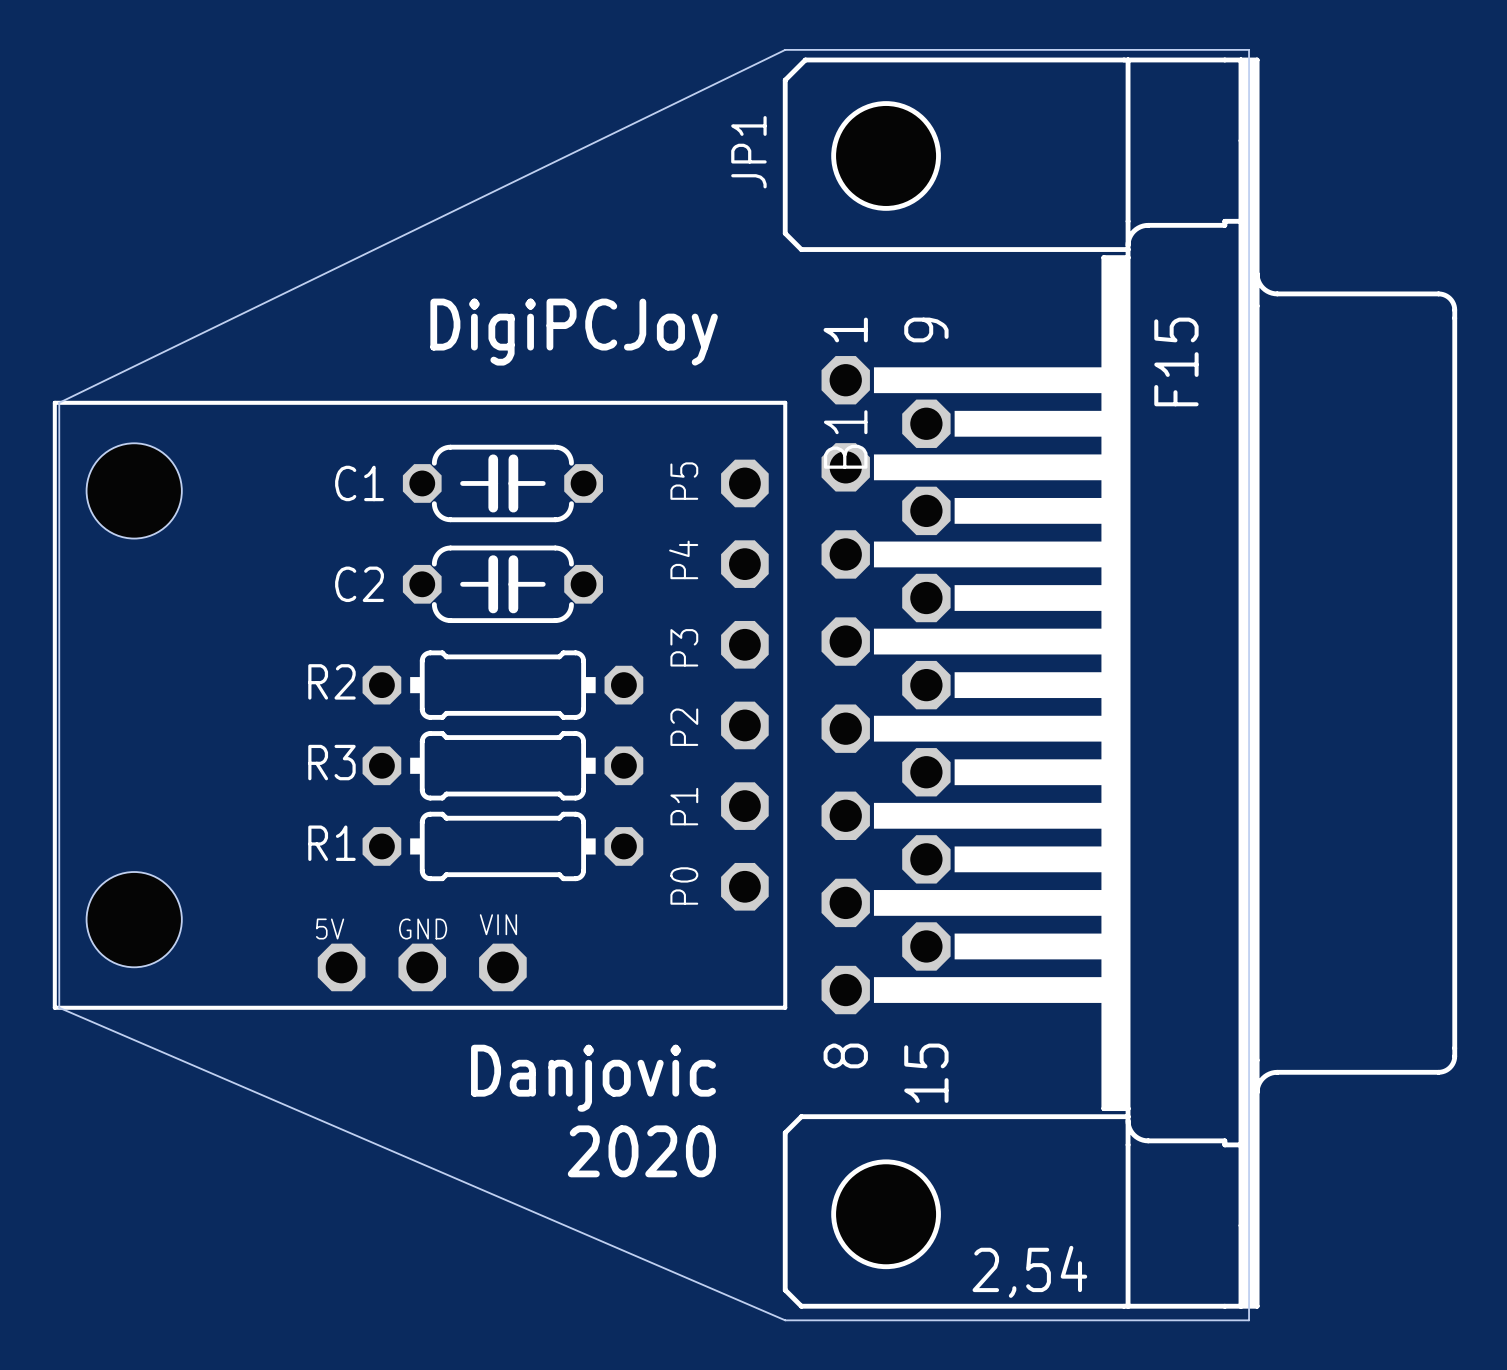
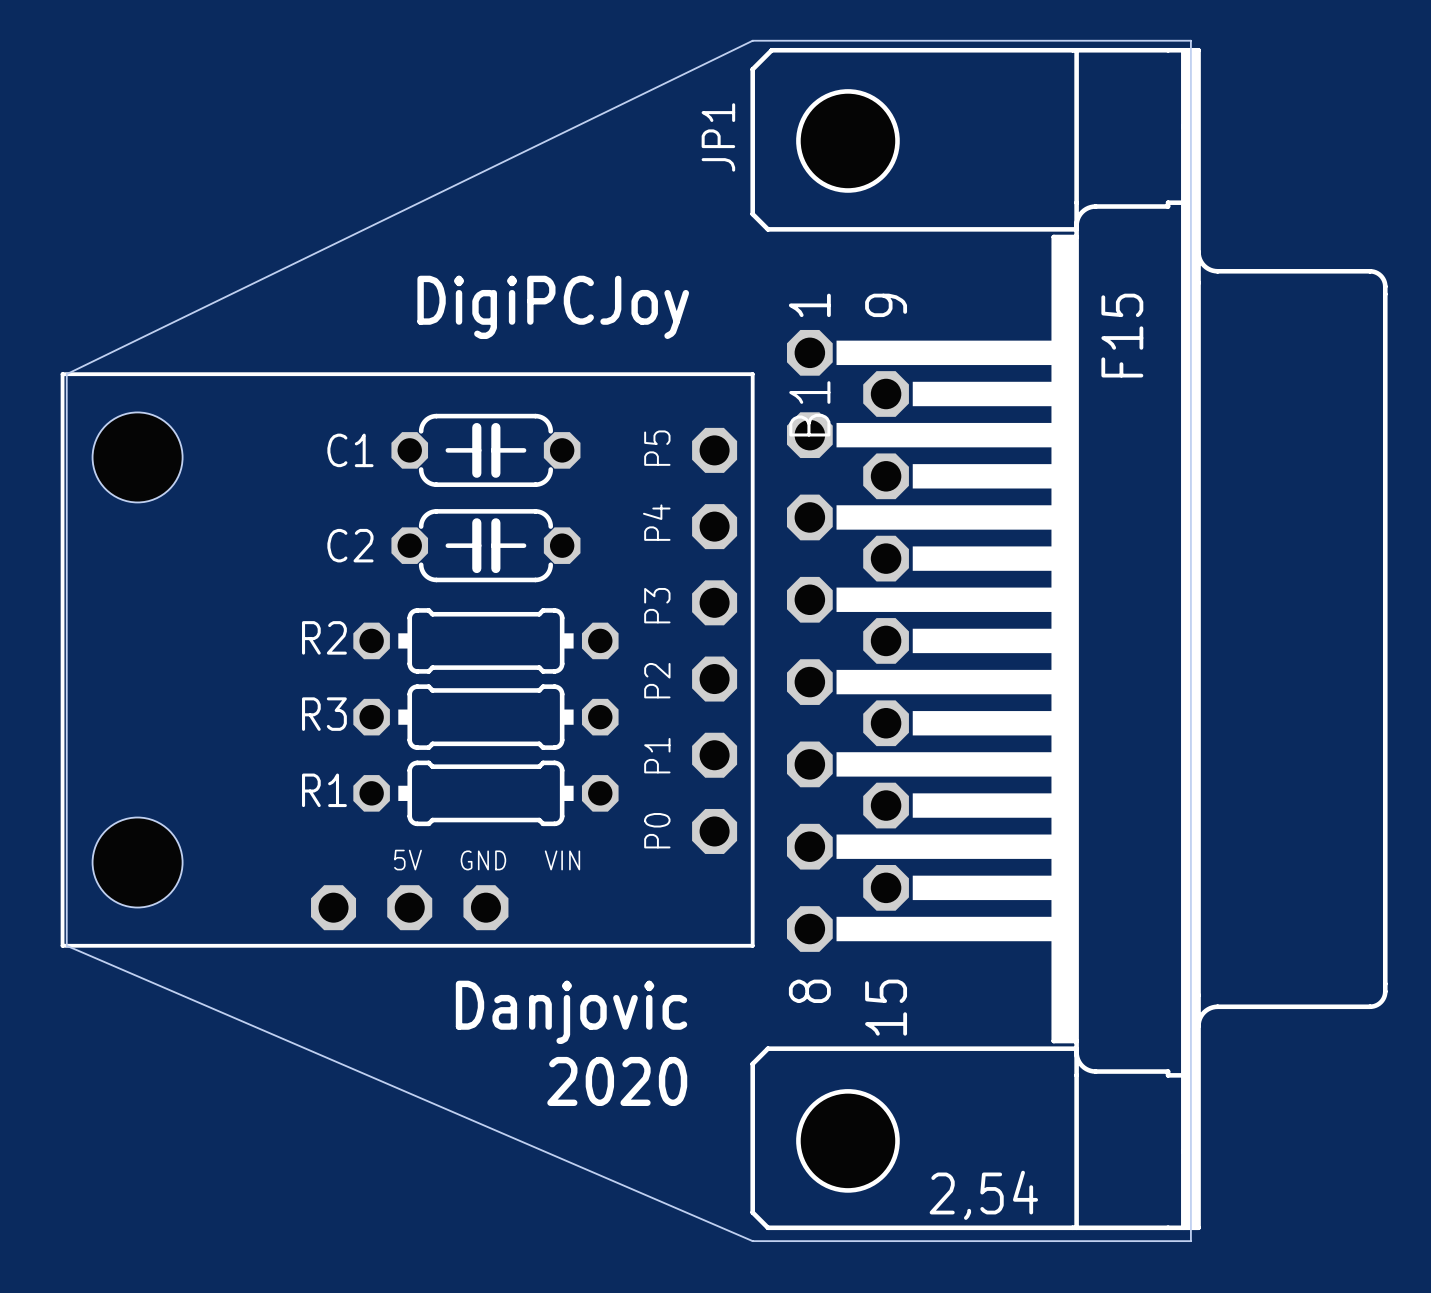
text position: VIN (498, 924) -> VIN (562, 860)
text position: 5V (330, 929) -> 5V (408, 860)
text position: GND (423, 929) -> GND (483, 860)

